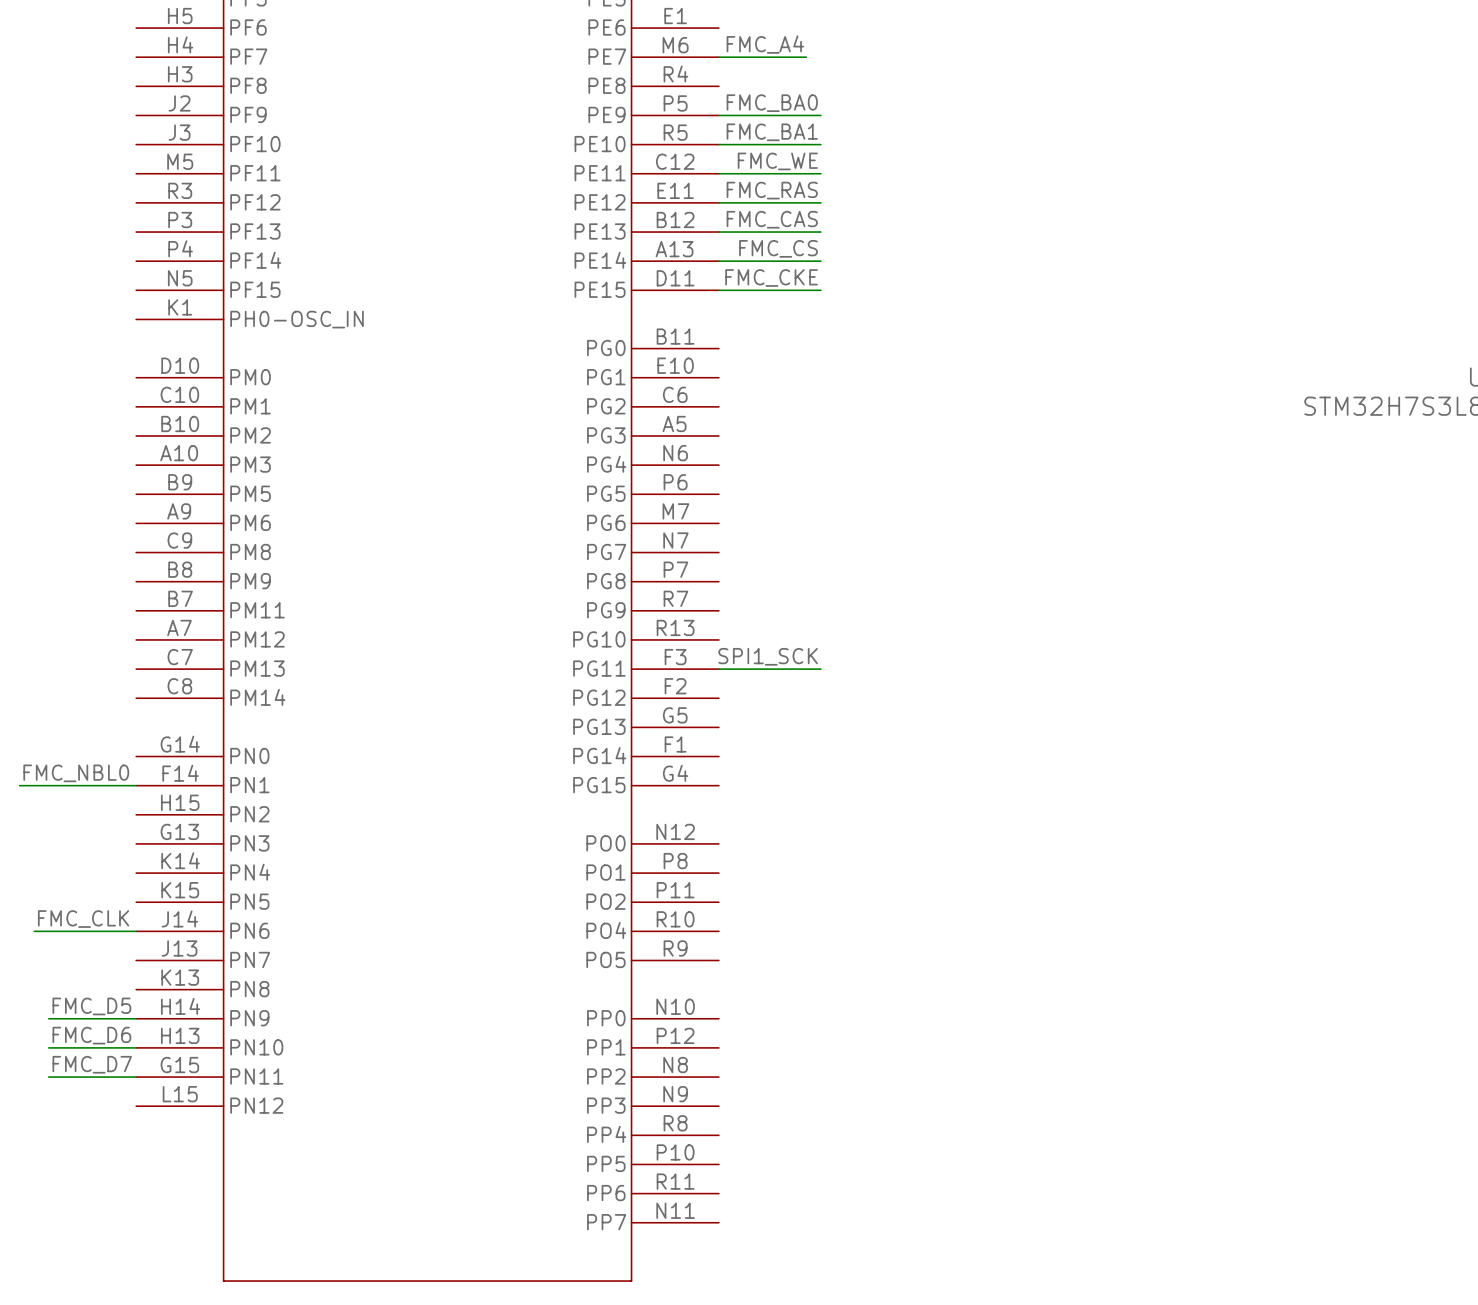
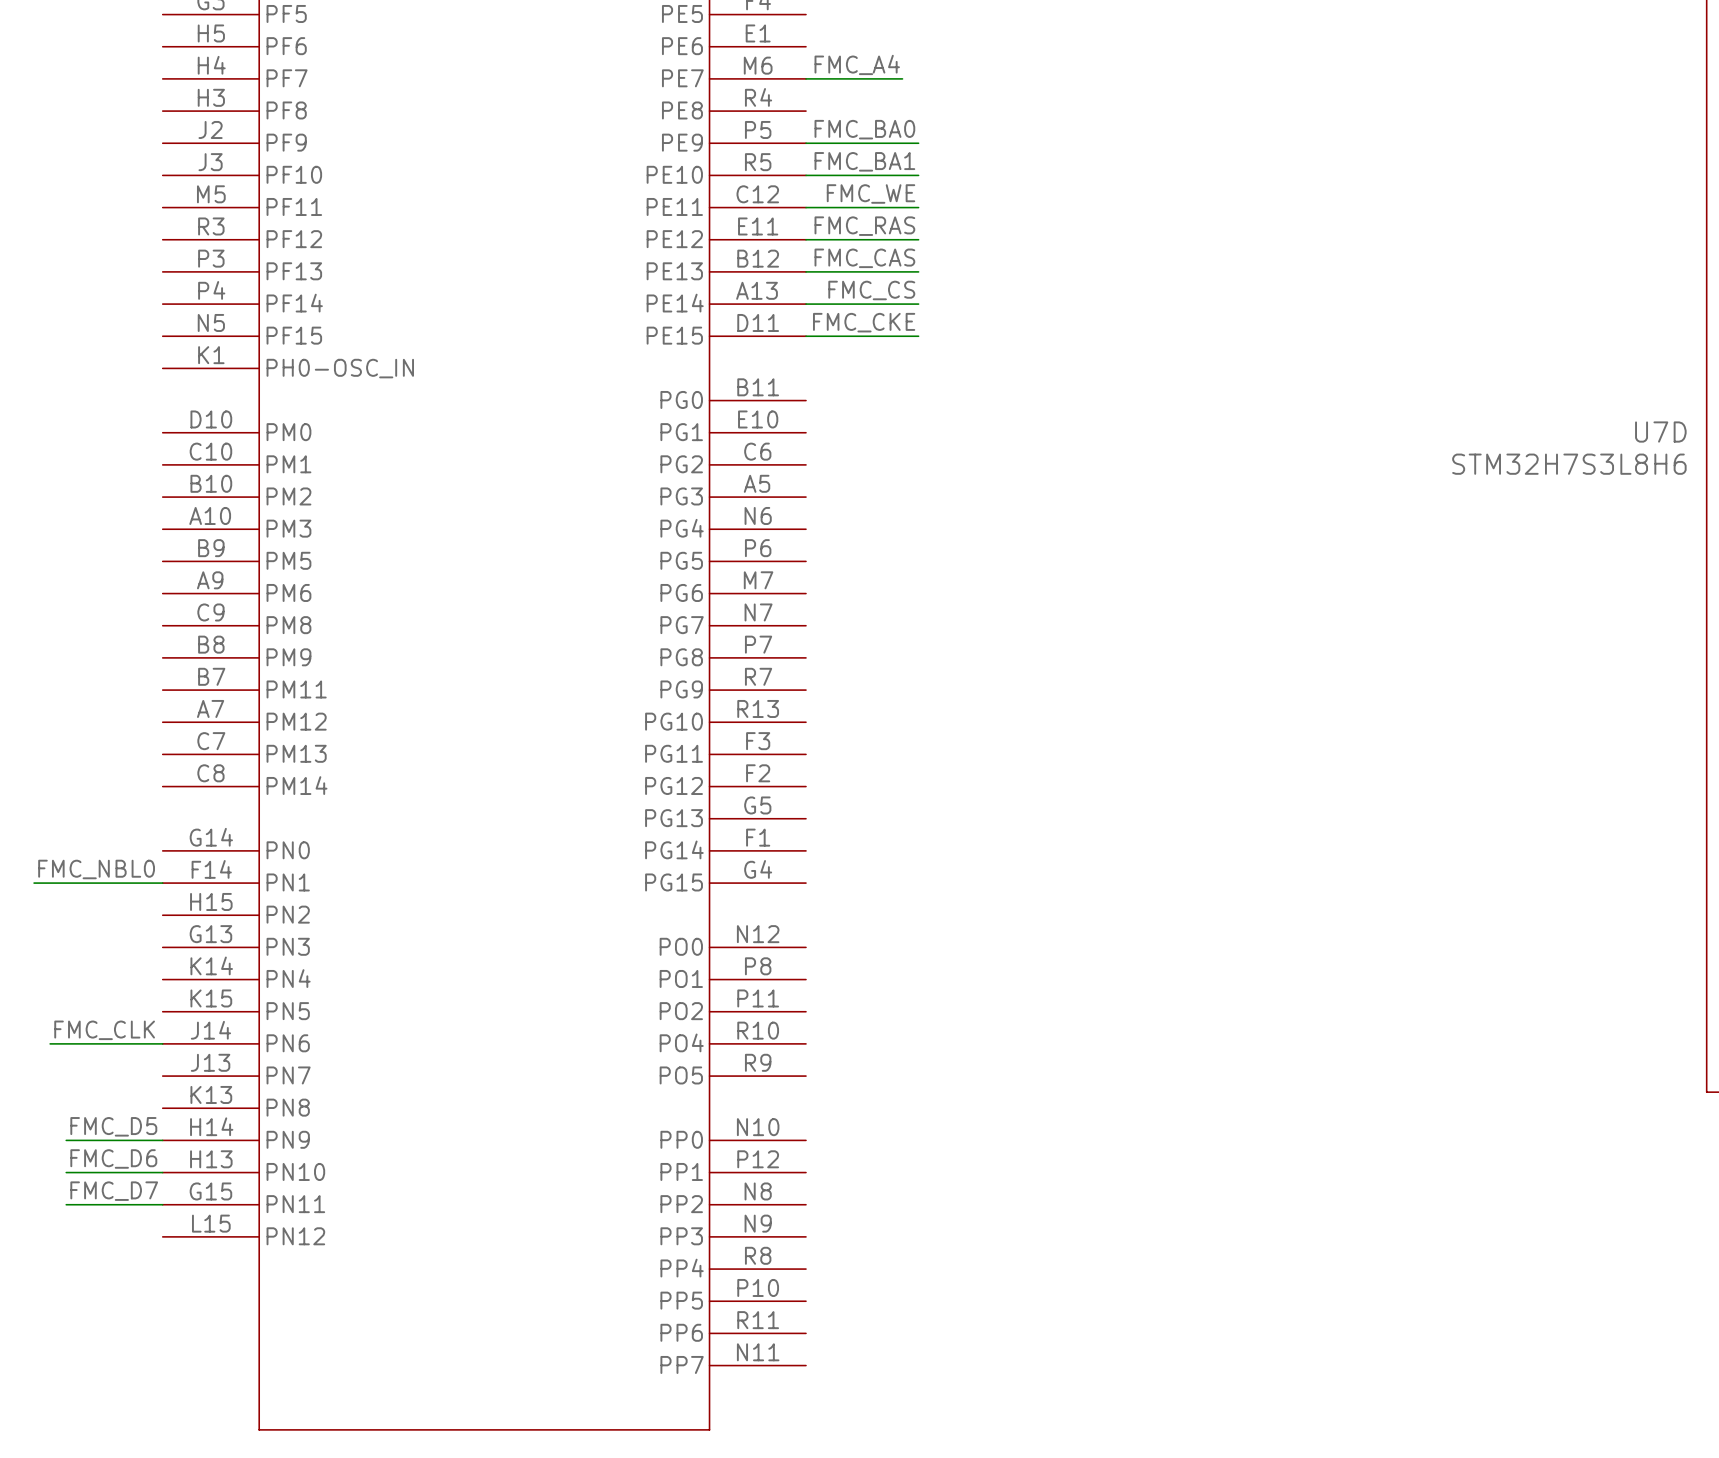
label: SPI1_SCK (768, 656) -> none
wire: (718, 669) (820, 669) -> none

